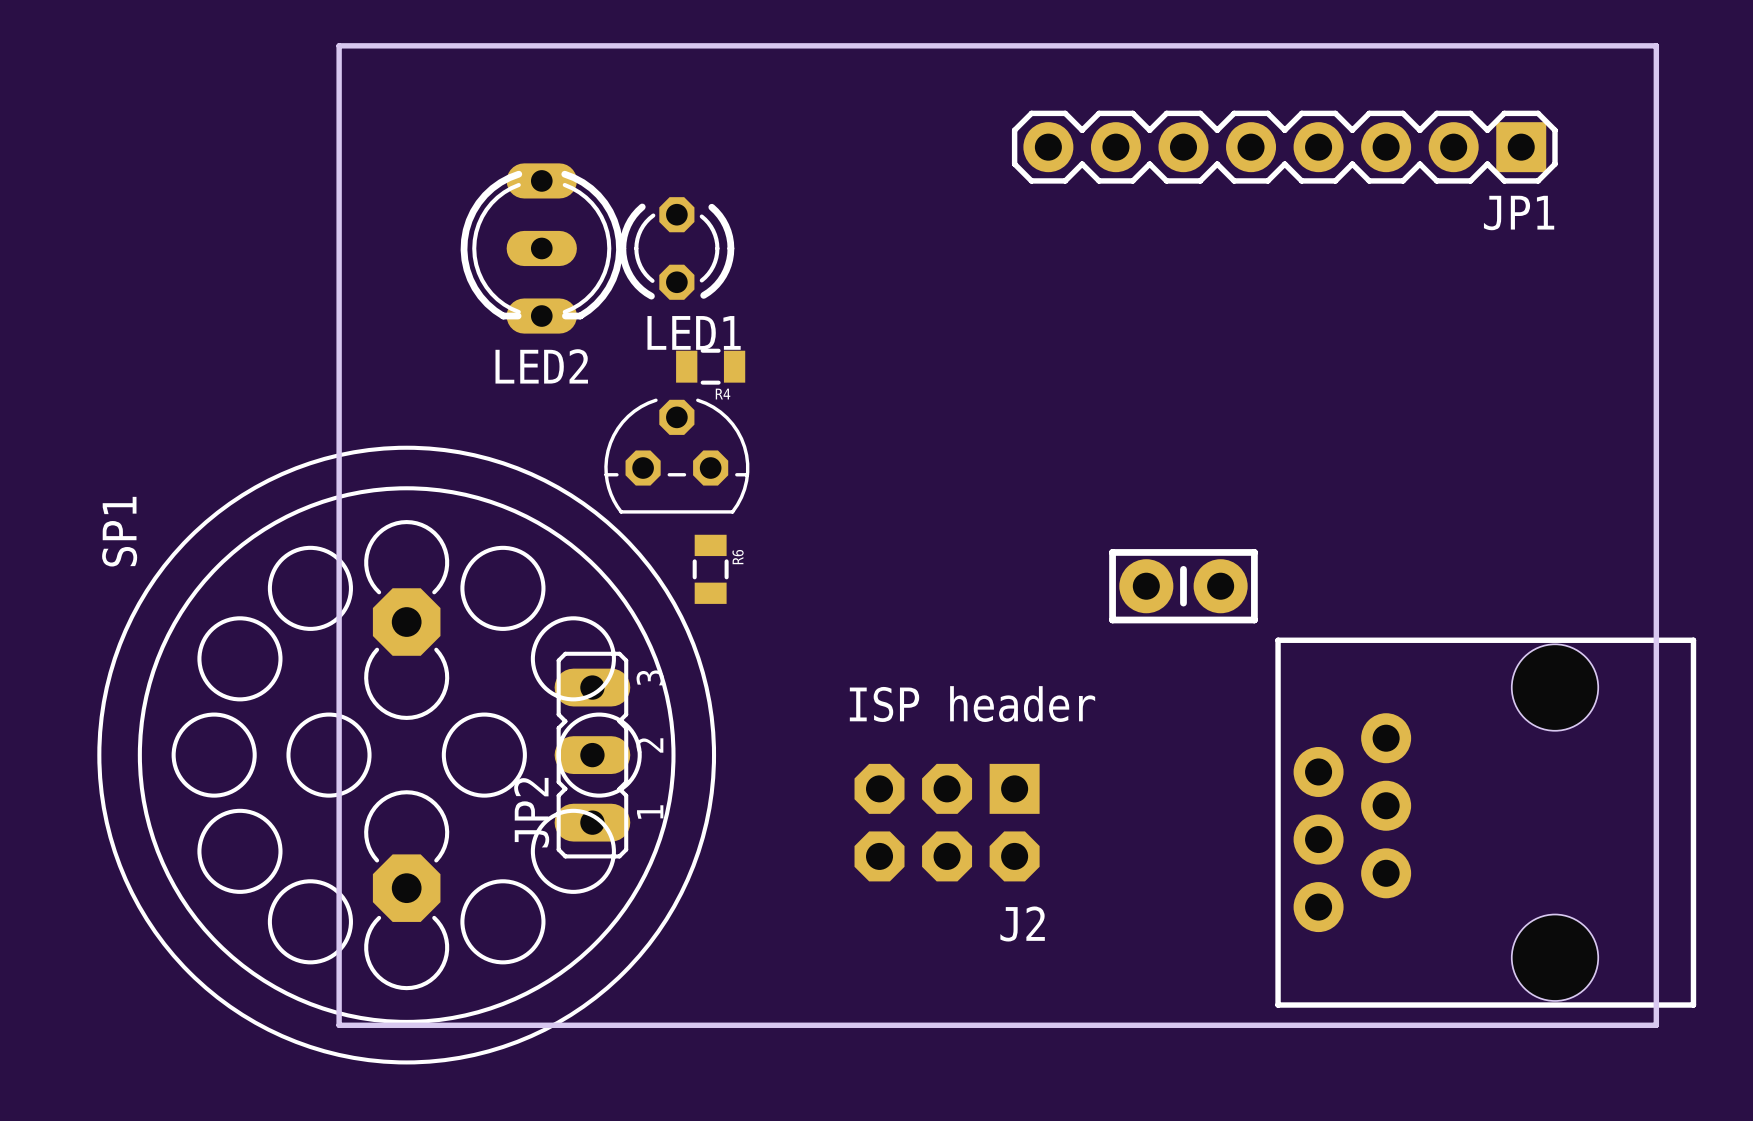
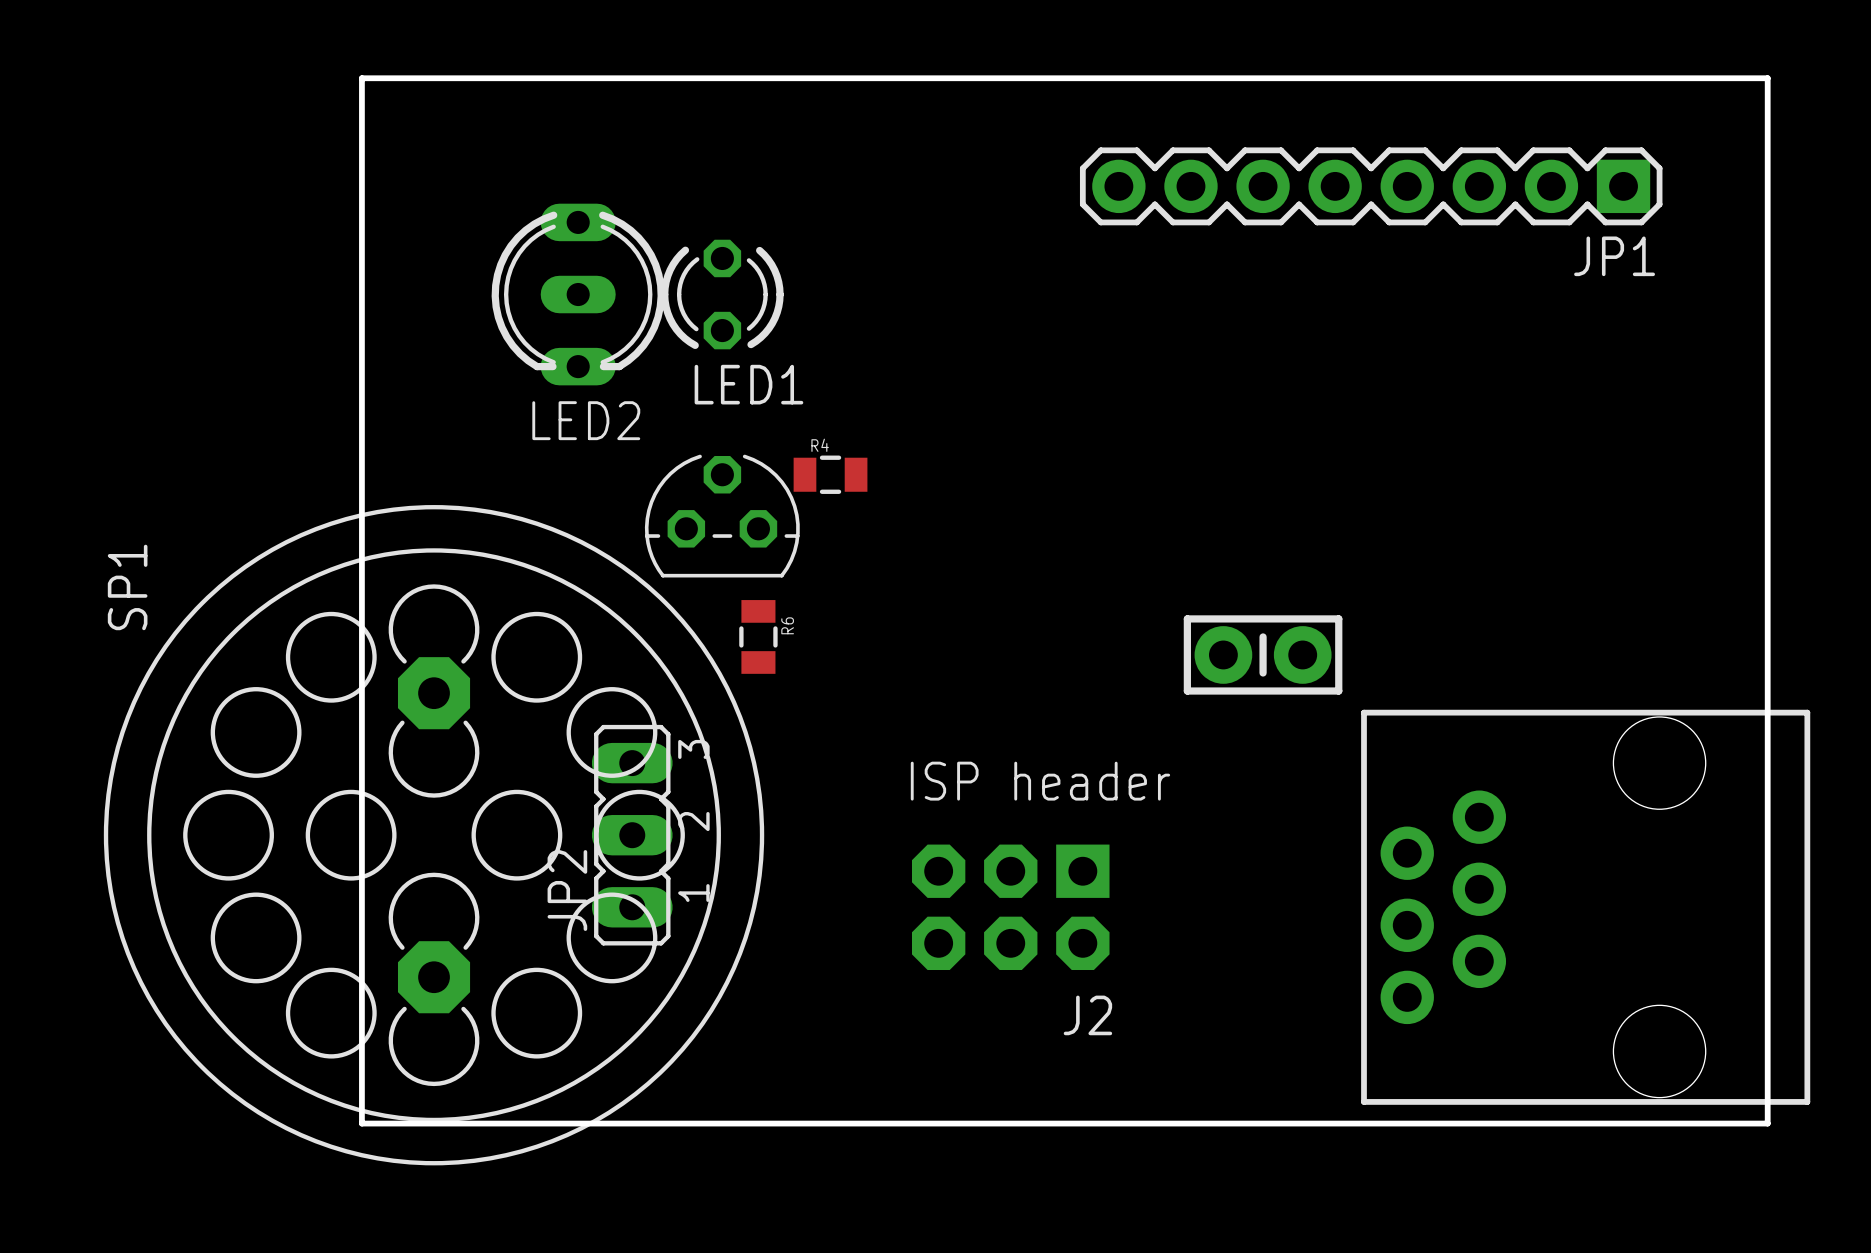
R4 position: (710, 366) -> (830, 474)
R4 name position: R4 (723, 394) -> R4 (820, 445)

